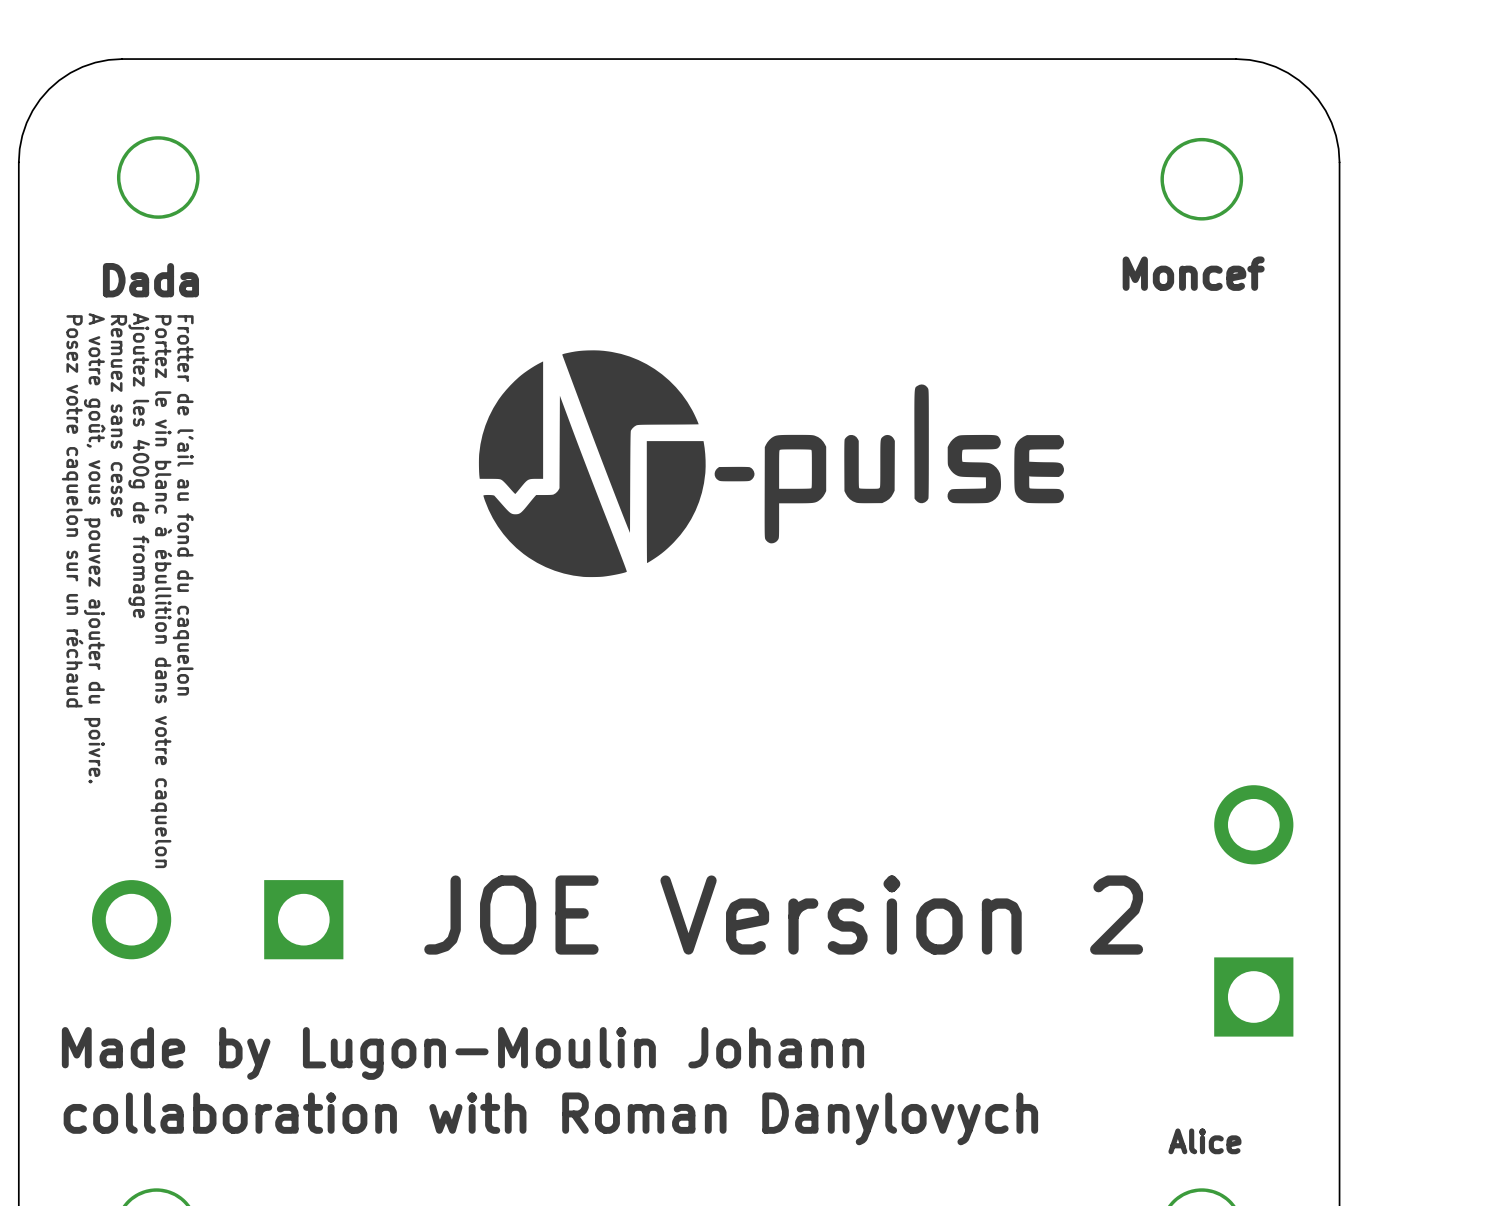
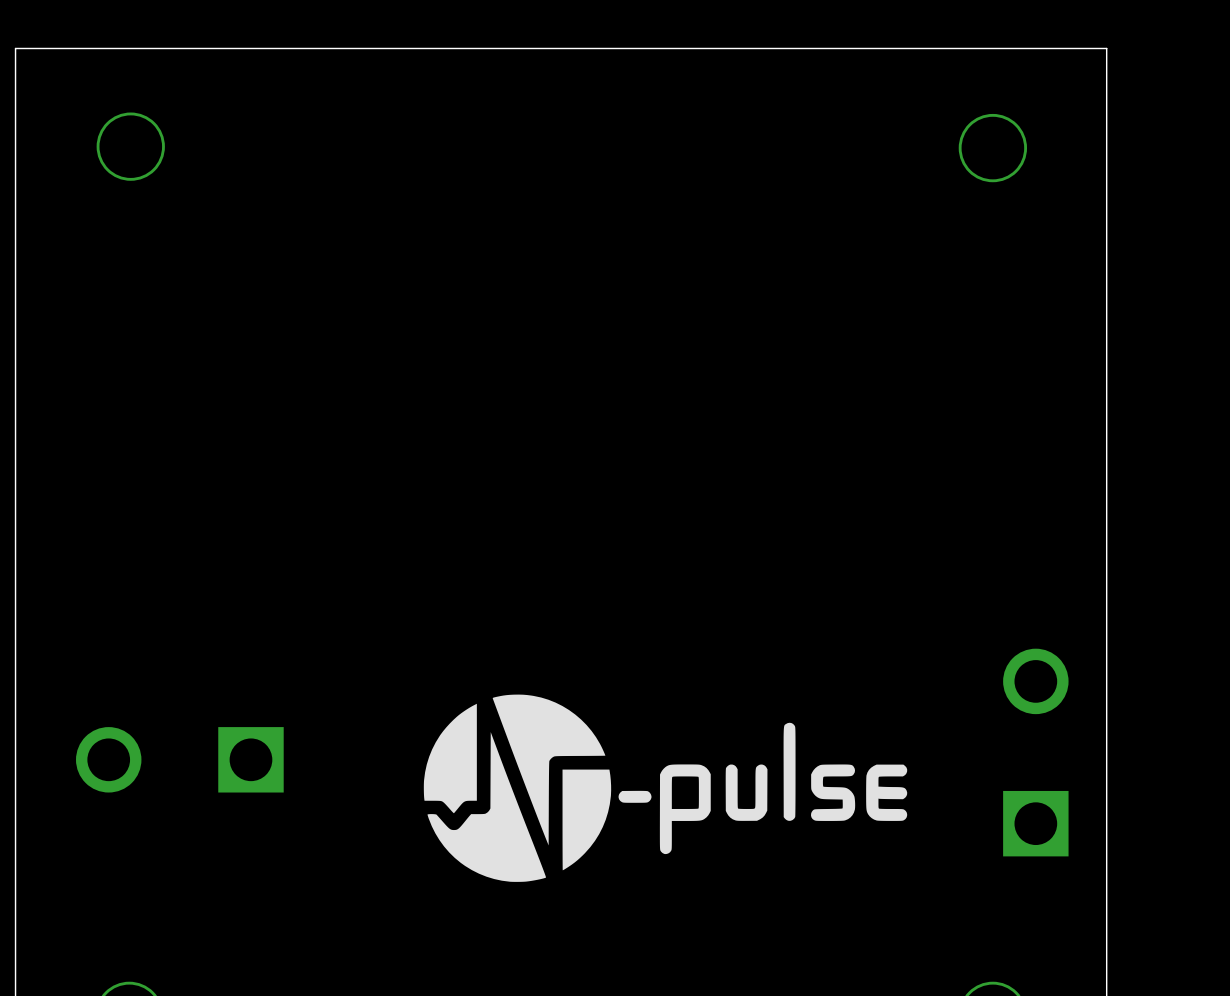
board edge: (1339, 162) (1336, 135) (1331, 122) (1325, 110) (1309, 89) (1299, 80) (1275, 66) (1262, 62) (1236, 59) (108, 59) (95, 62) (70, 72) (49, 89) (32, 110) (26, 122) (22, 135) (18, 162) -> (1106, 134) (1106, 48) (15, 48) (15, 134)
text: Moncef (1193, 273) -> none
text: Dada (150, 280) -> none
text: Remuez sans cesse (118, 416) -> none
drawing position: (771, 463) -> (665, 788)
text: Ajoutez les 400g de fromage (139, 465) -> none
text: Frotter de l'ail au fond du caquelon (183, 505) -> none
text: Posez votre caquelon sur un réchaud (72, 511) -> none
text: A votre goût, vous pouvez ajouter du poivre. (94, 548) -> none
text: Portez le vin blanc à ébullition dans votre caquelon (161, 591) -> none
text: JOE Version 2 (783, 915) -> none
text: Made by Lugon-Moulin Johann (462, 1053) -> none
text: collaboration with Roman Danylovych (550, 1118) -> none
text: Alice (1204, 1141) -> none

